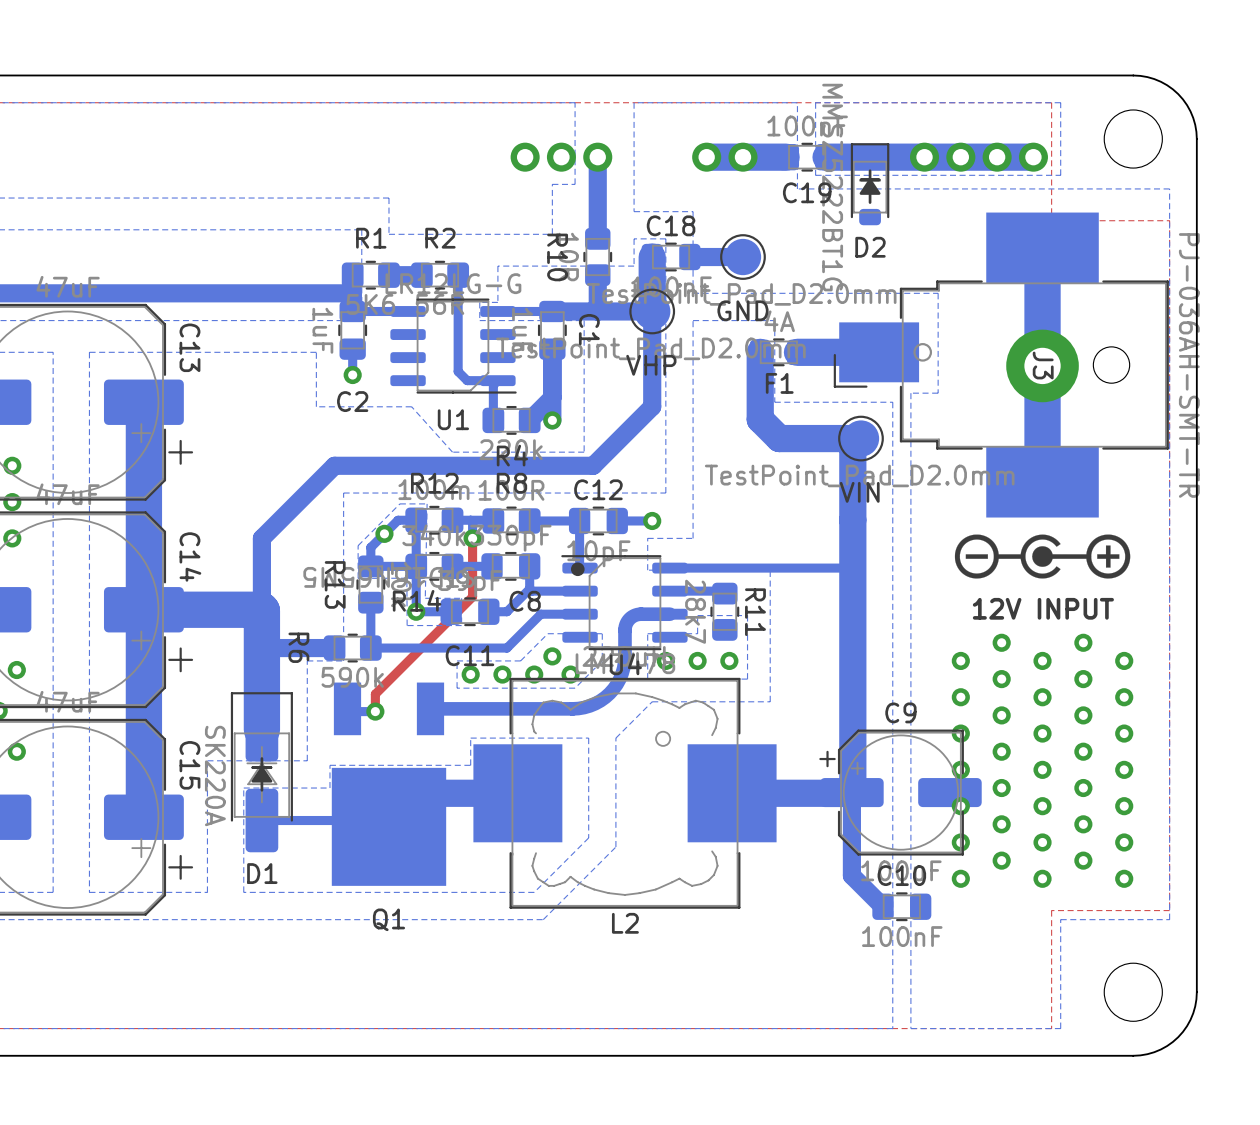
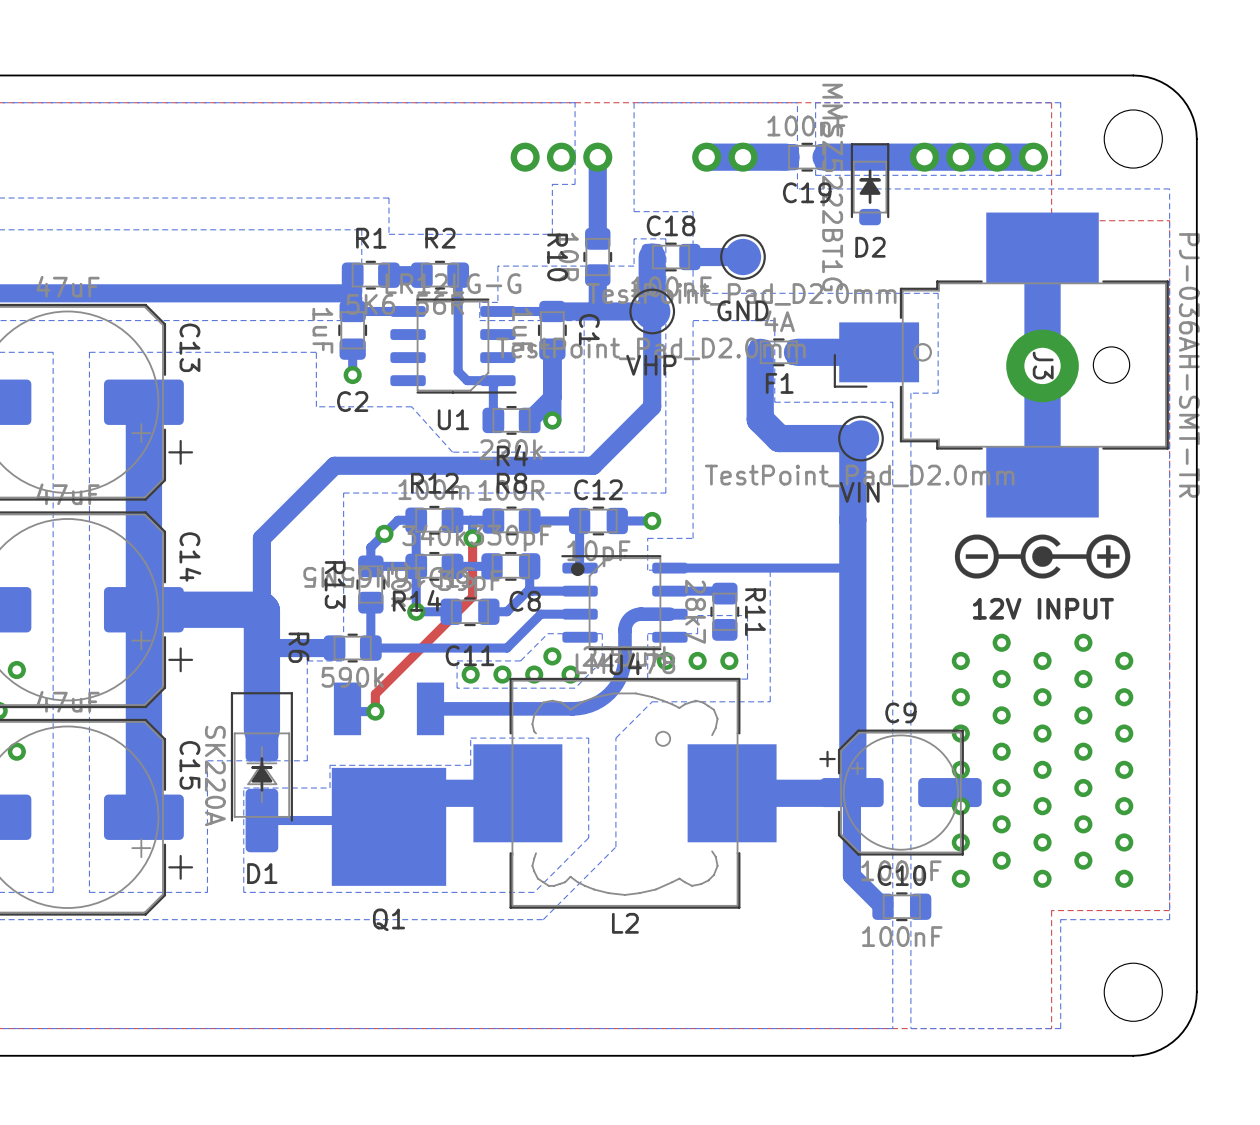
via: (12, 465) -> none
via: (12, 502) -> none
bottom zone outline: (427, 503) (399, 503) (358, 545) (358, 578) (406, 578) (407, 625) (461, 625) (461, 598) (425, 598) (427, 503) -> none
via: (12, 538) -> none

